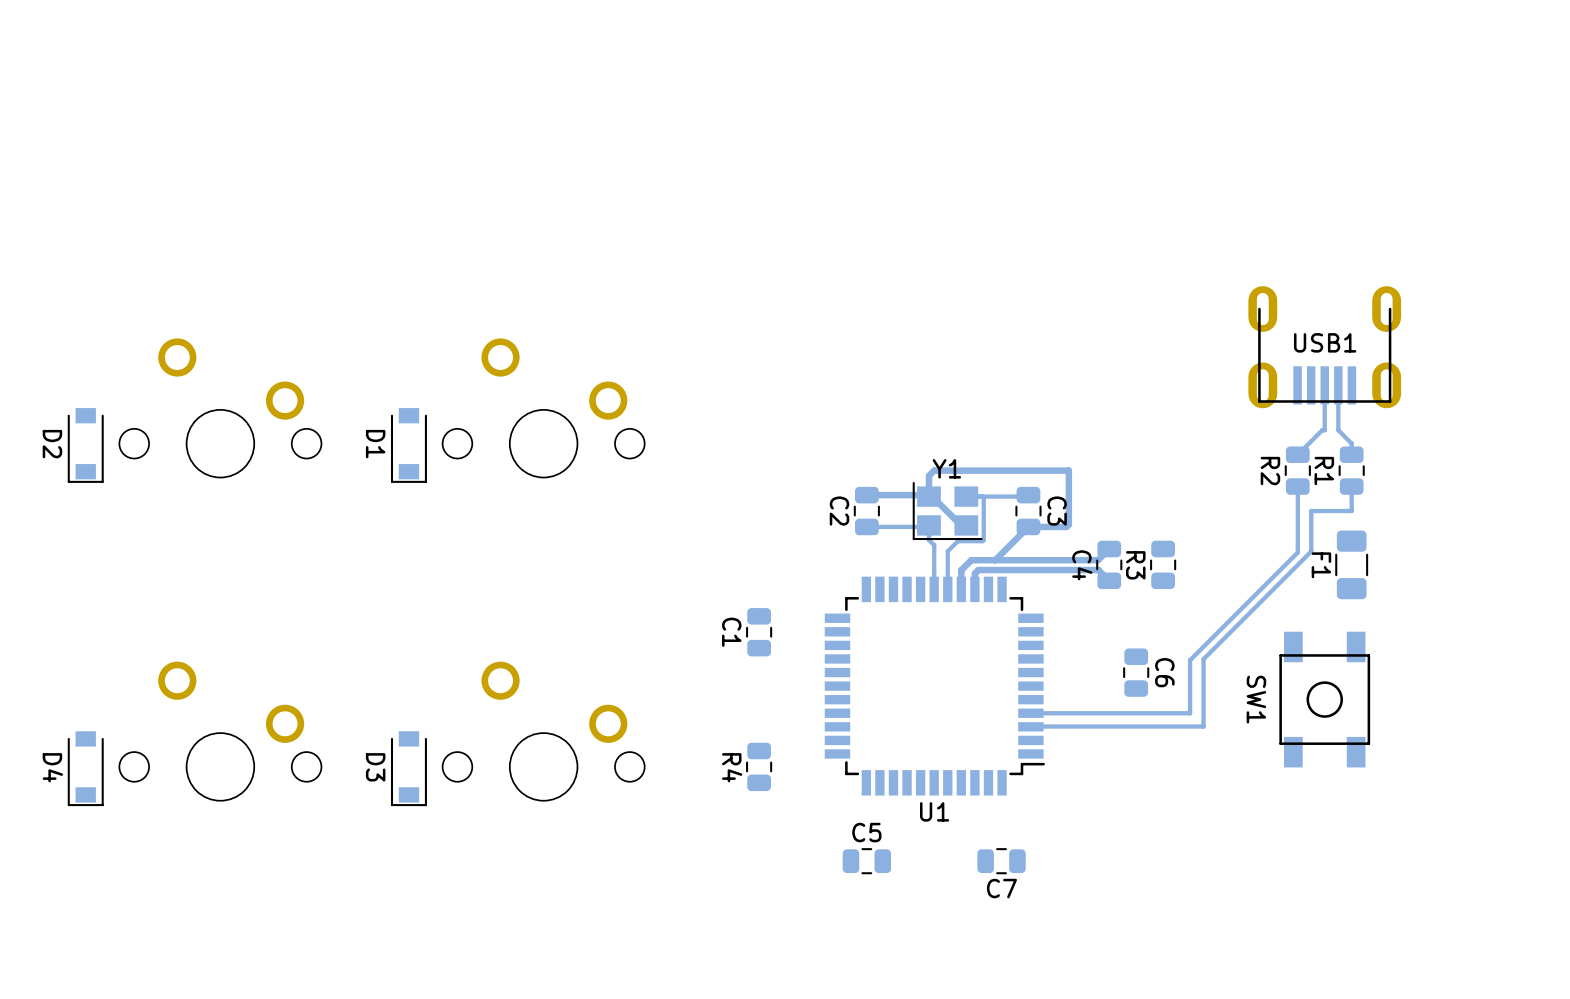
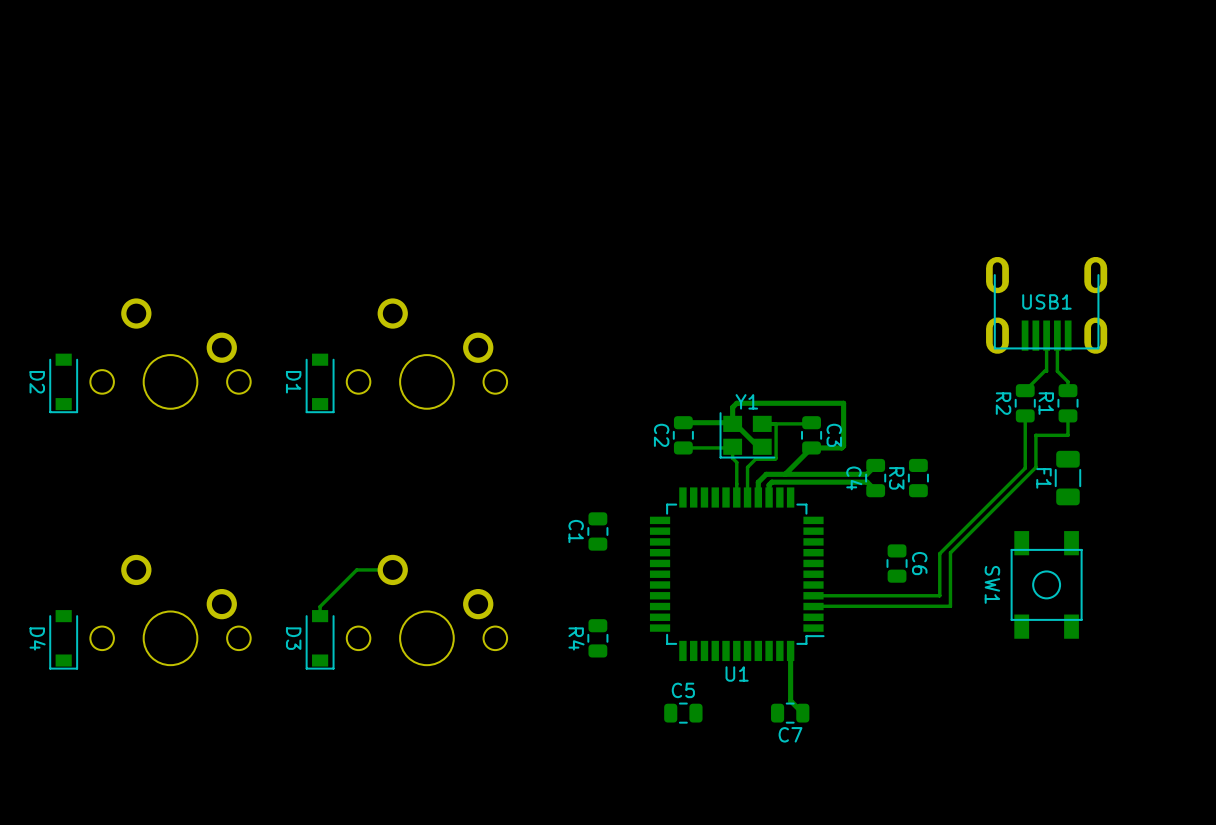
track: none -> (392, 569) (356, 569) (320, 606) (320, 616)
track: none -> (790, 650) (790, 700) (802, 713)

